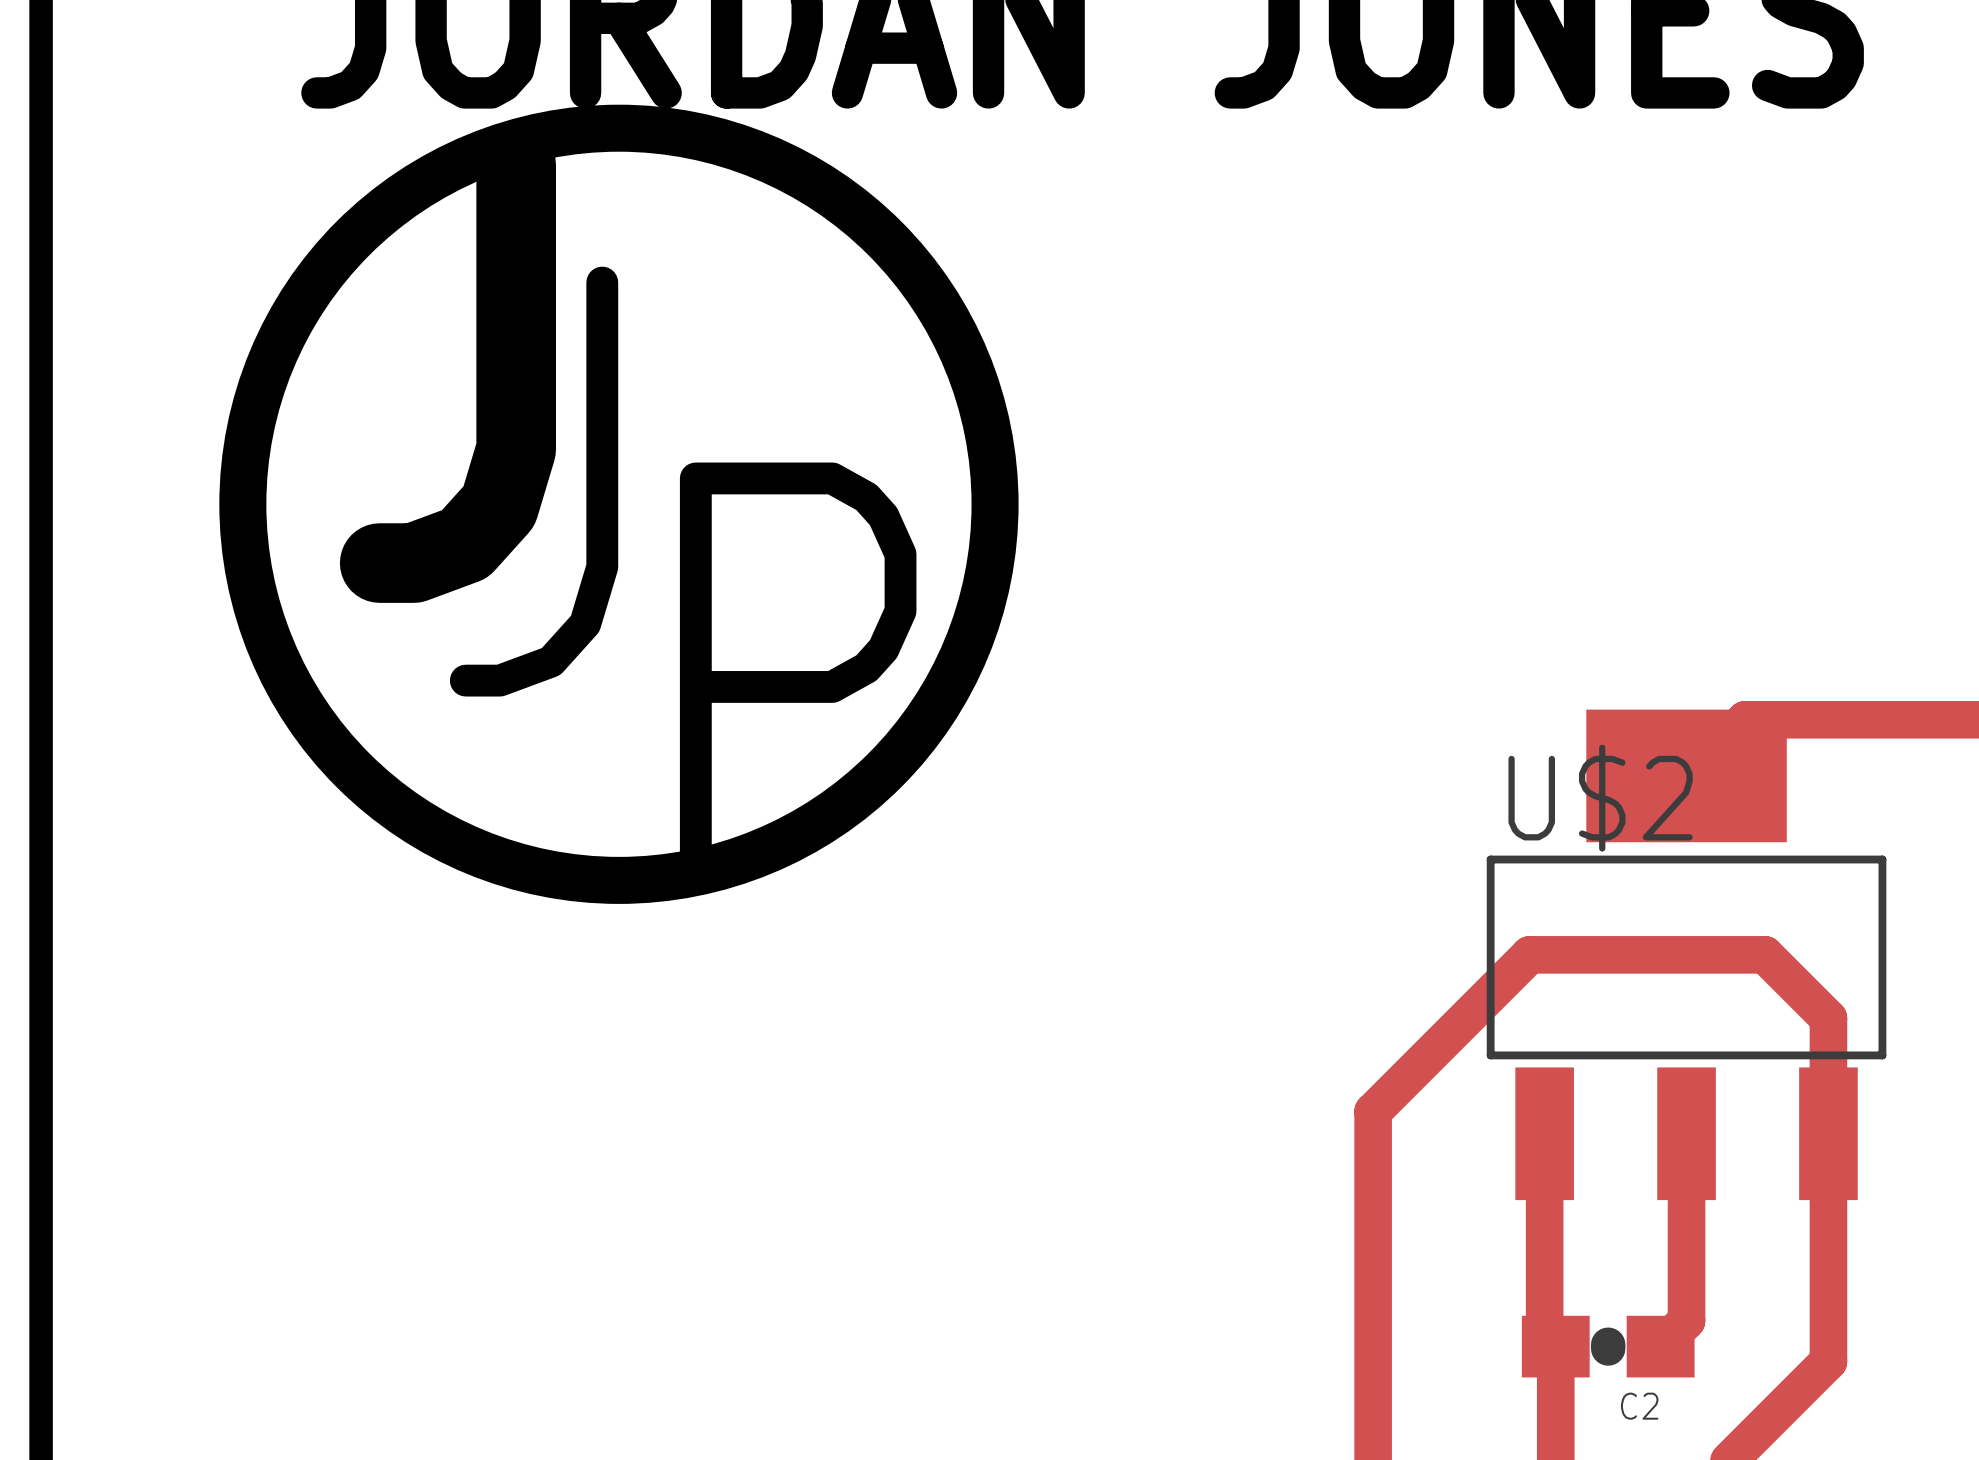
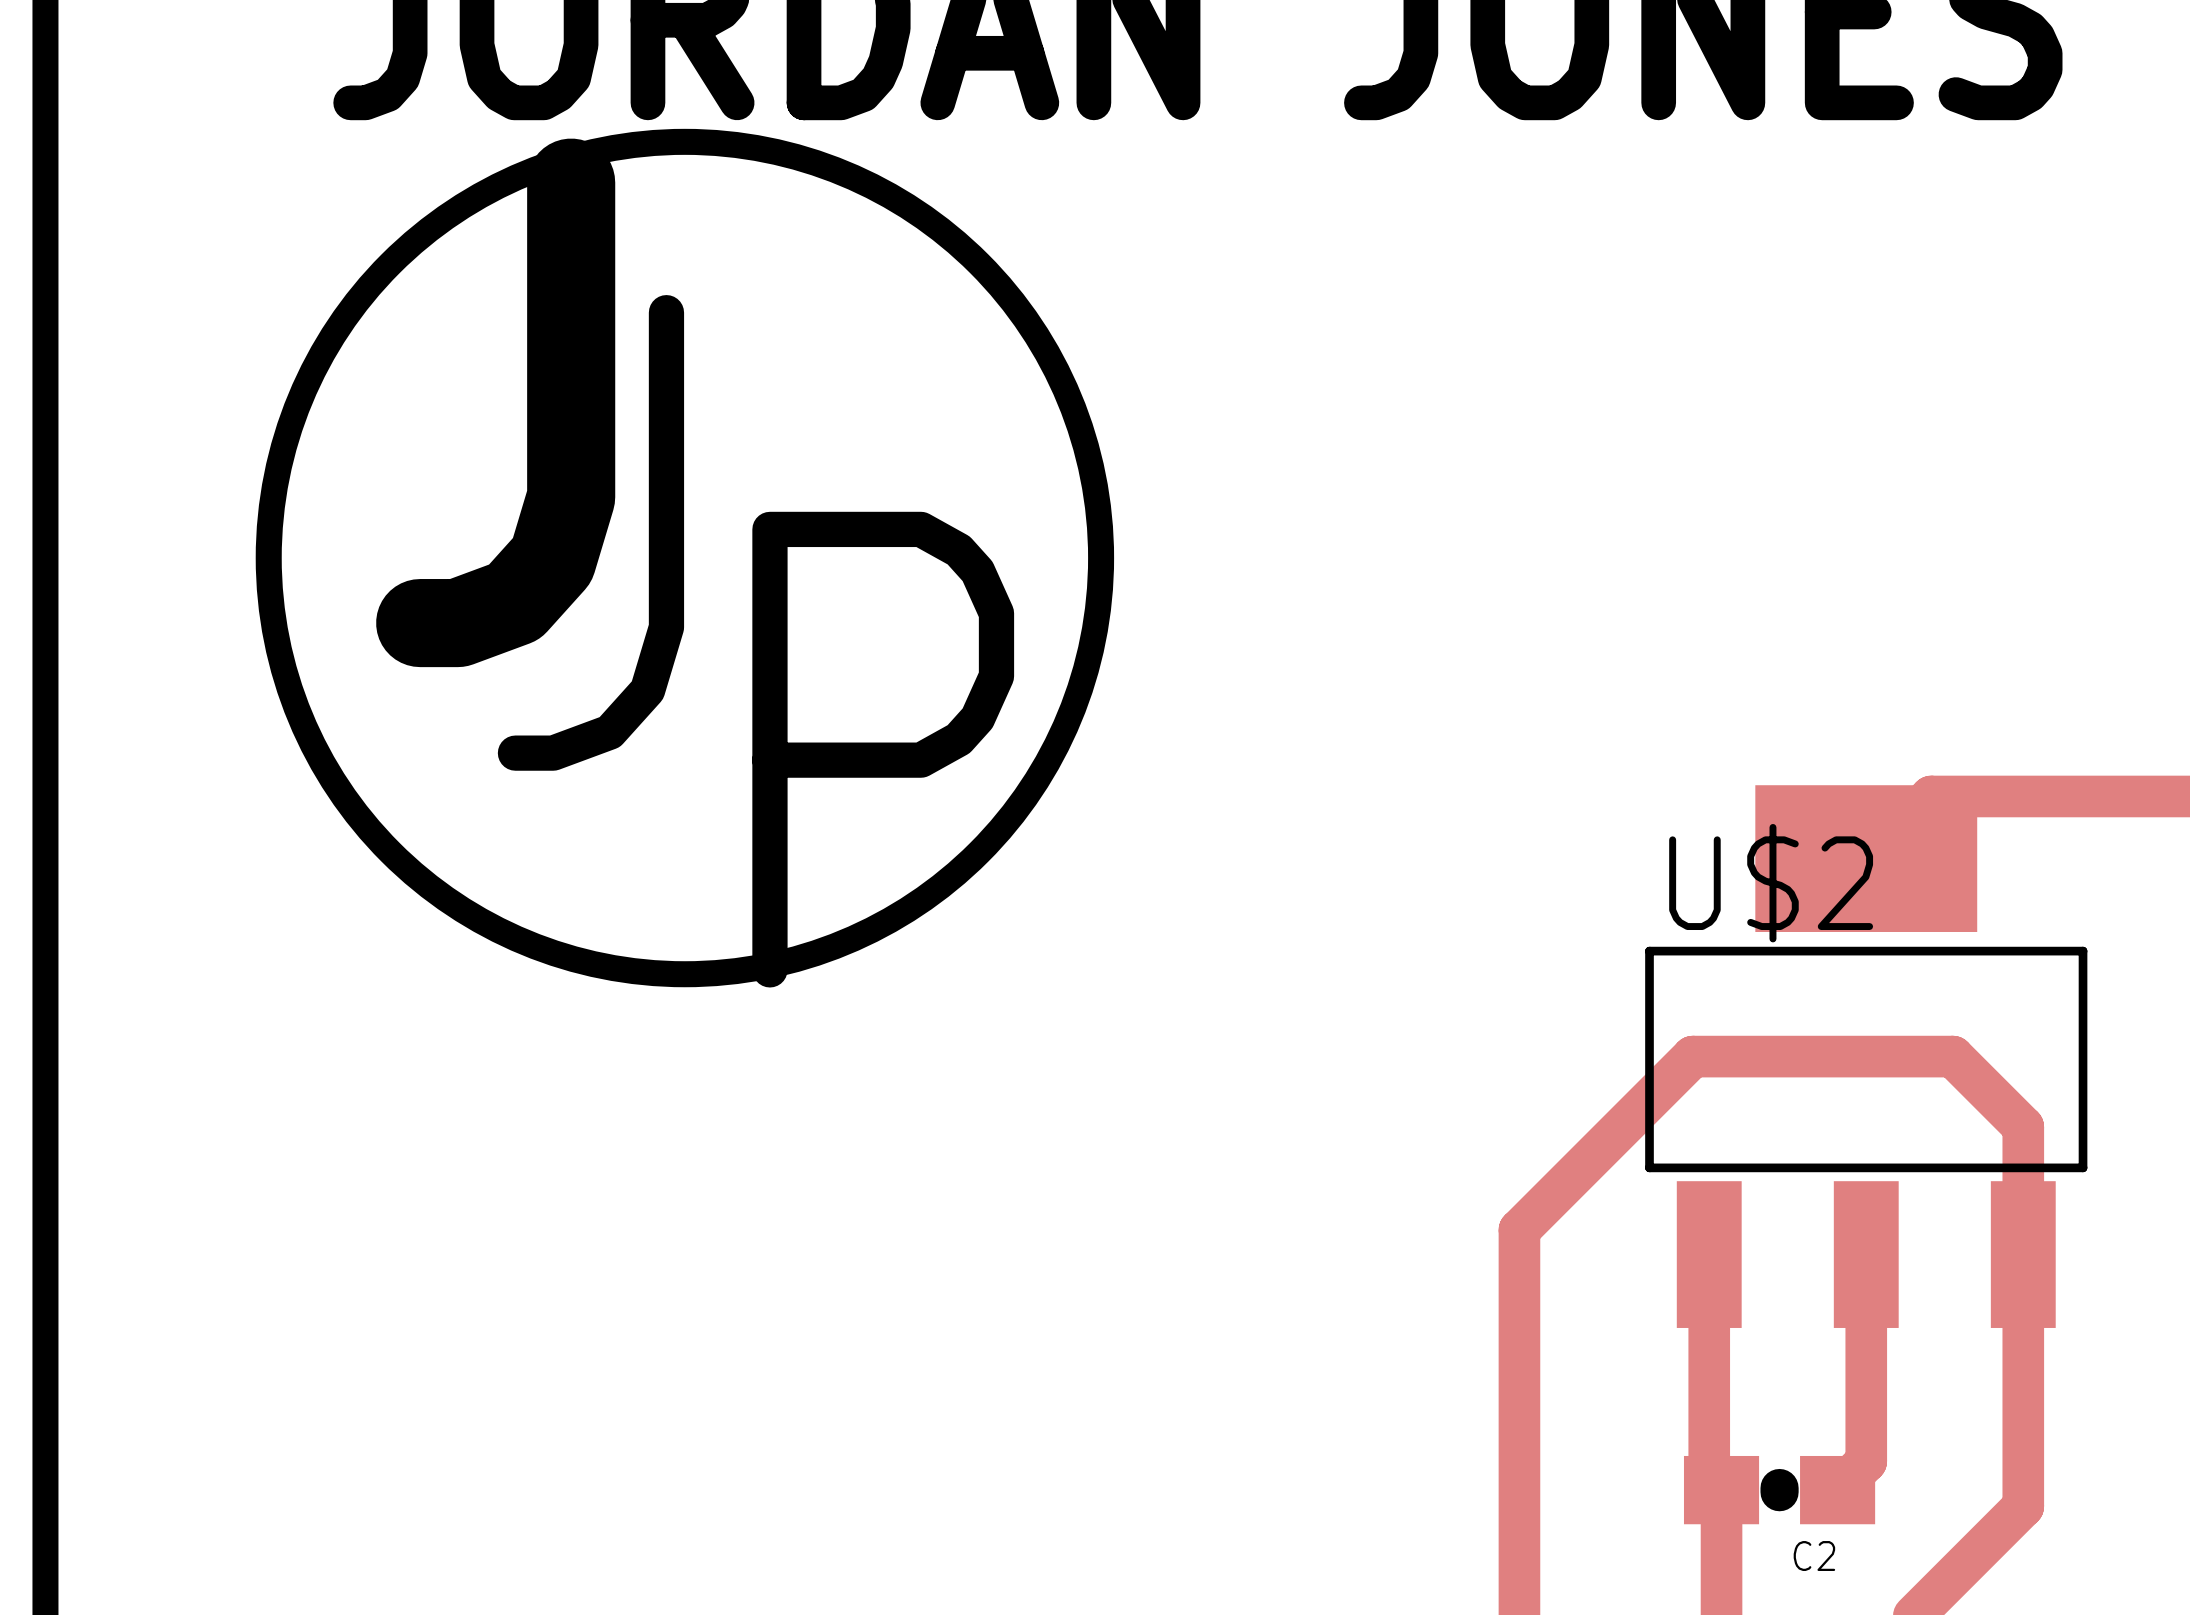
round board edge size: [219, 104, 1019, 904] -> [255, 128, 1115, 988]

